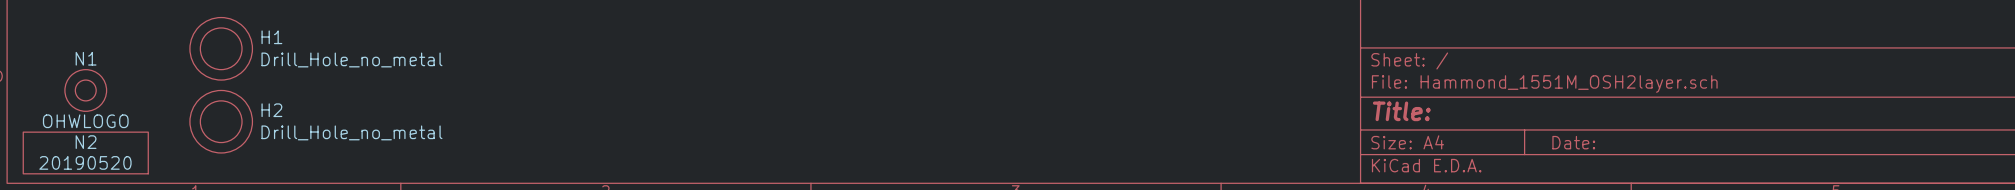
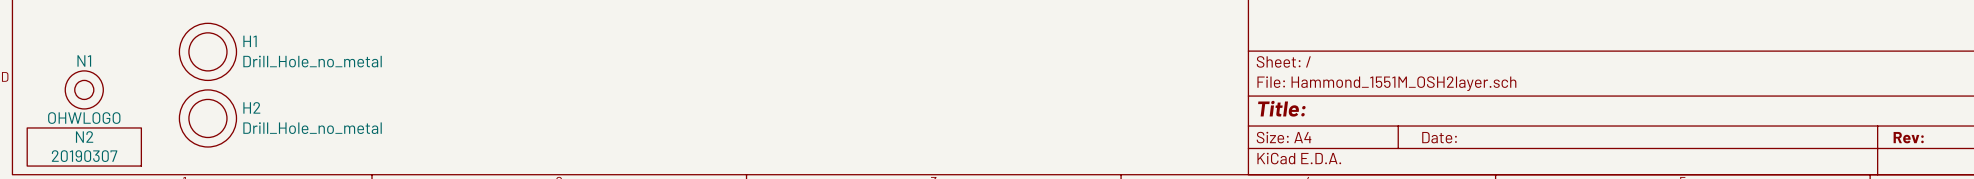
N2 value: 20190520 (85, 162) -> 20190307 (84, 156)

